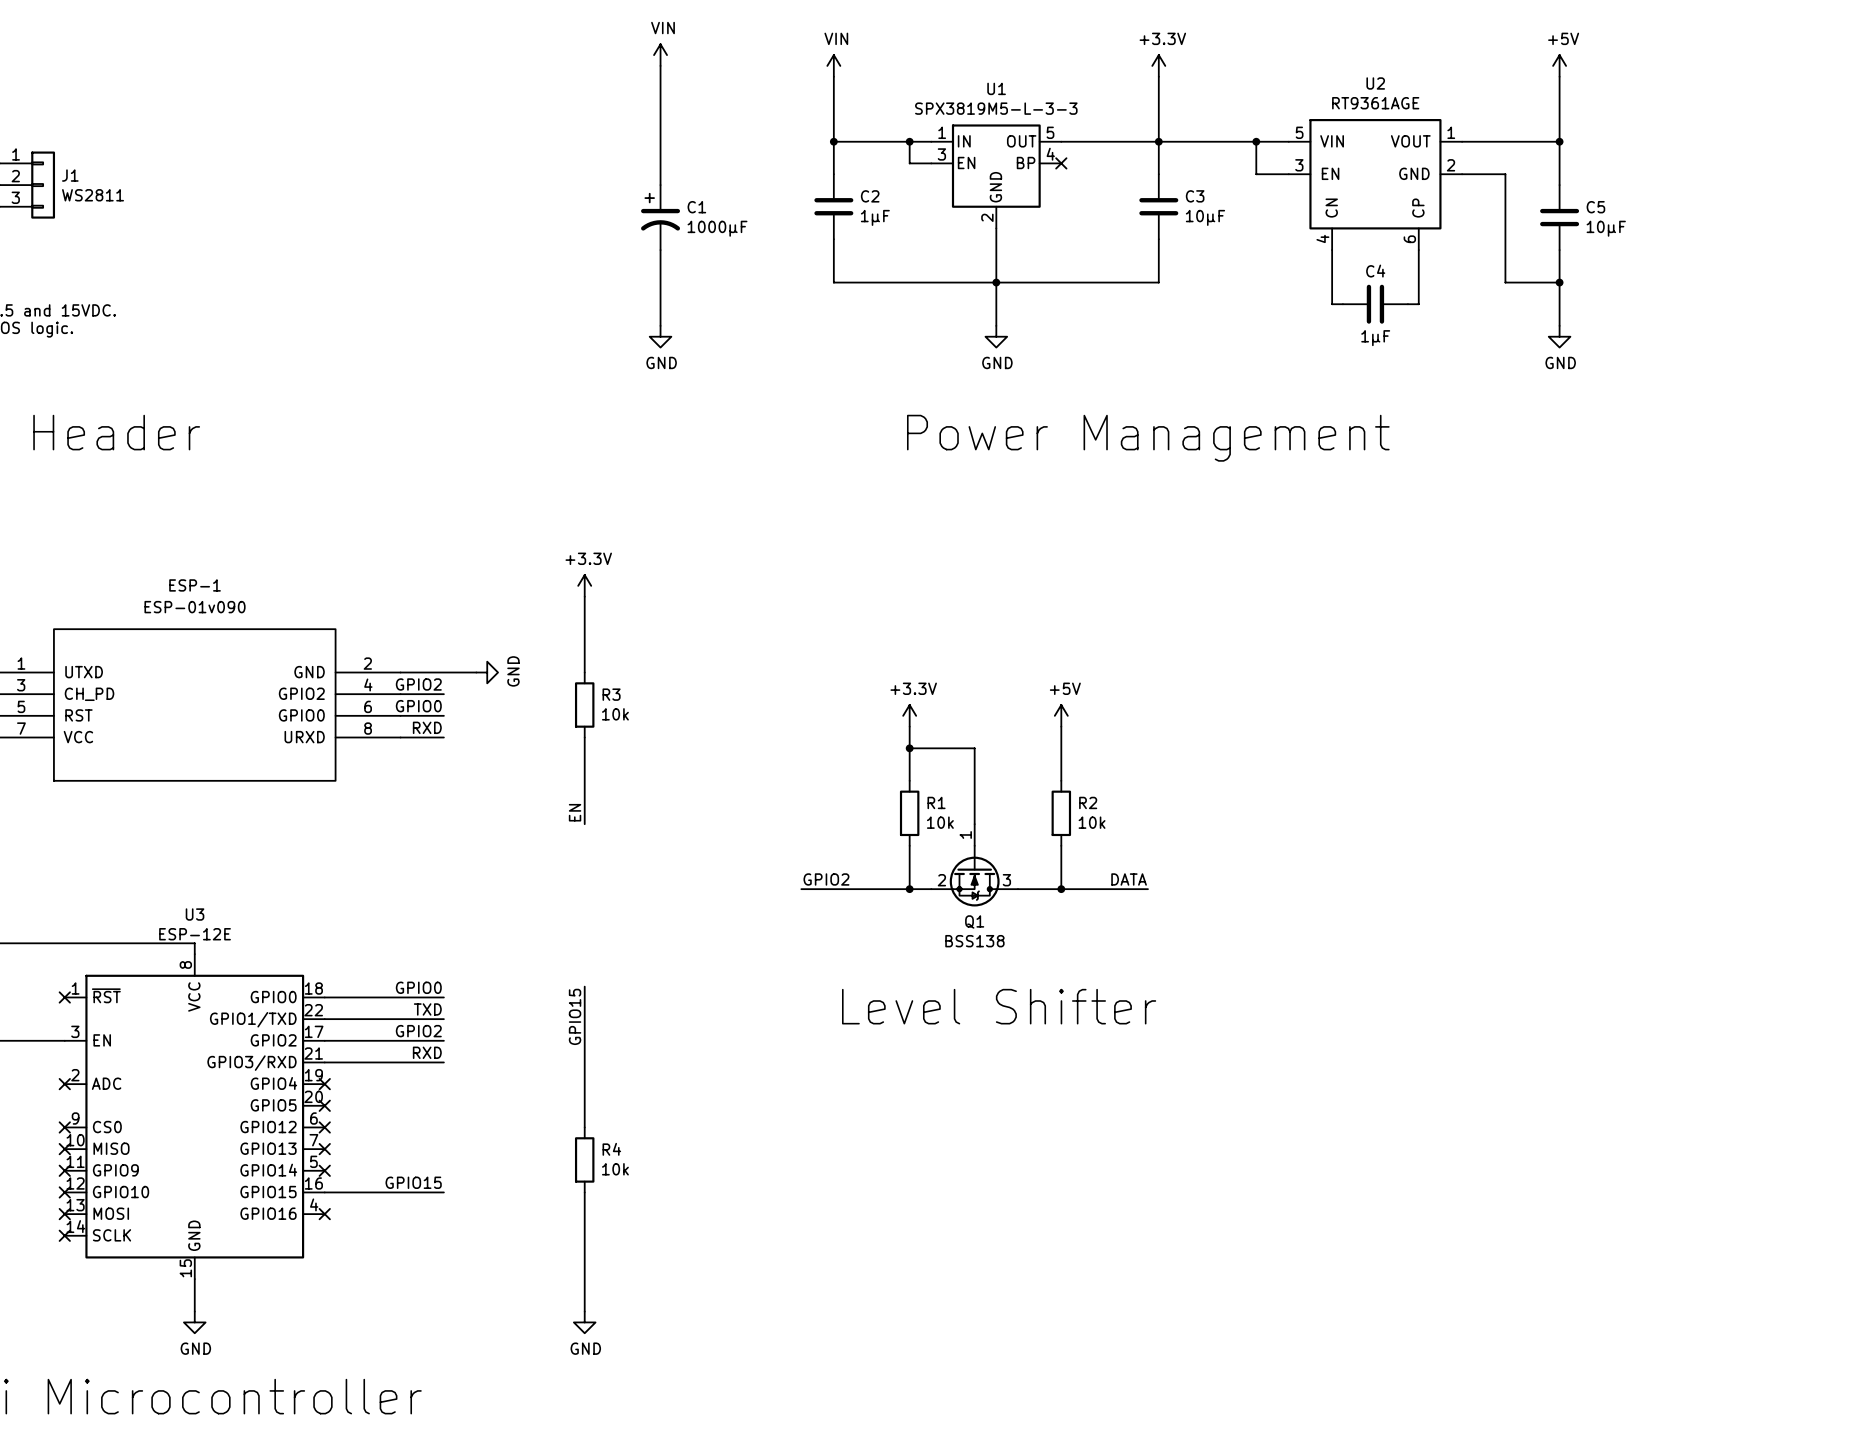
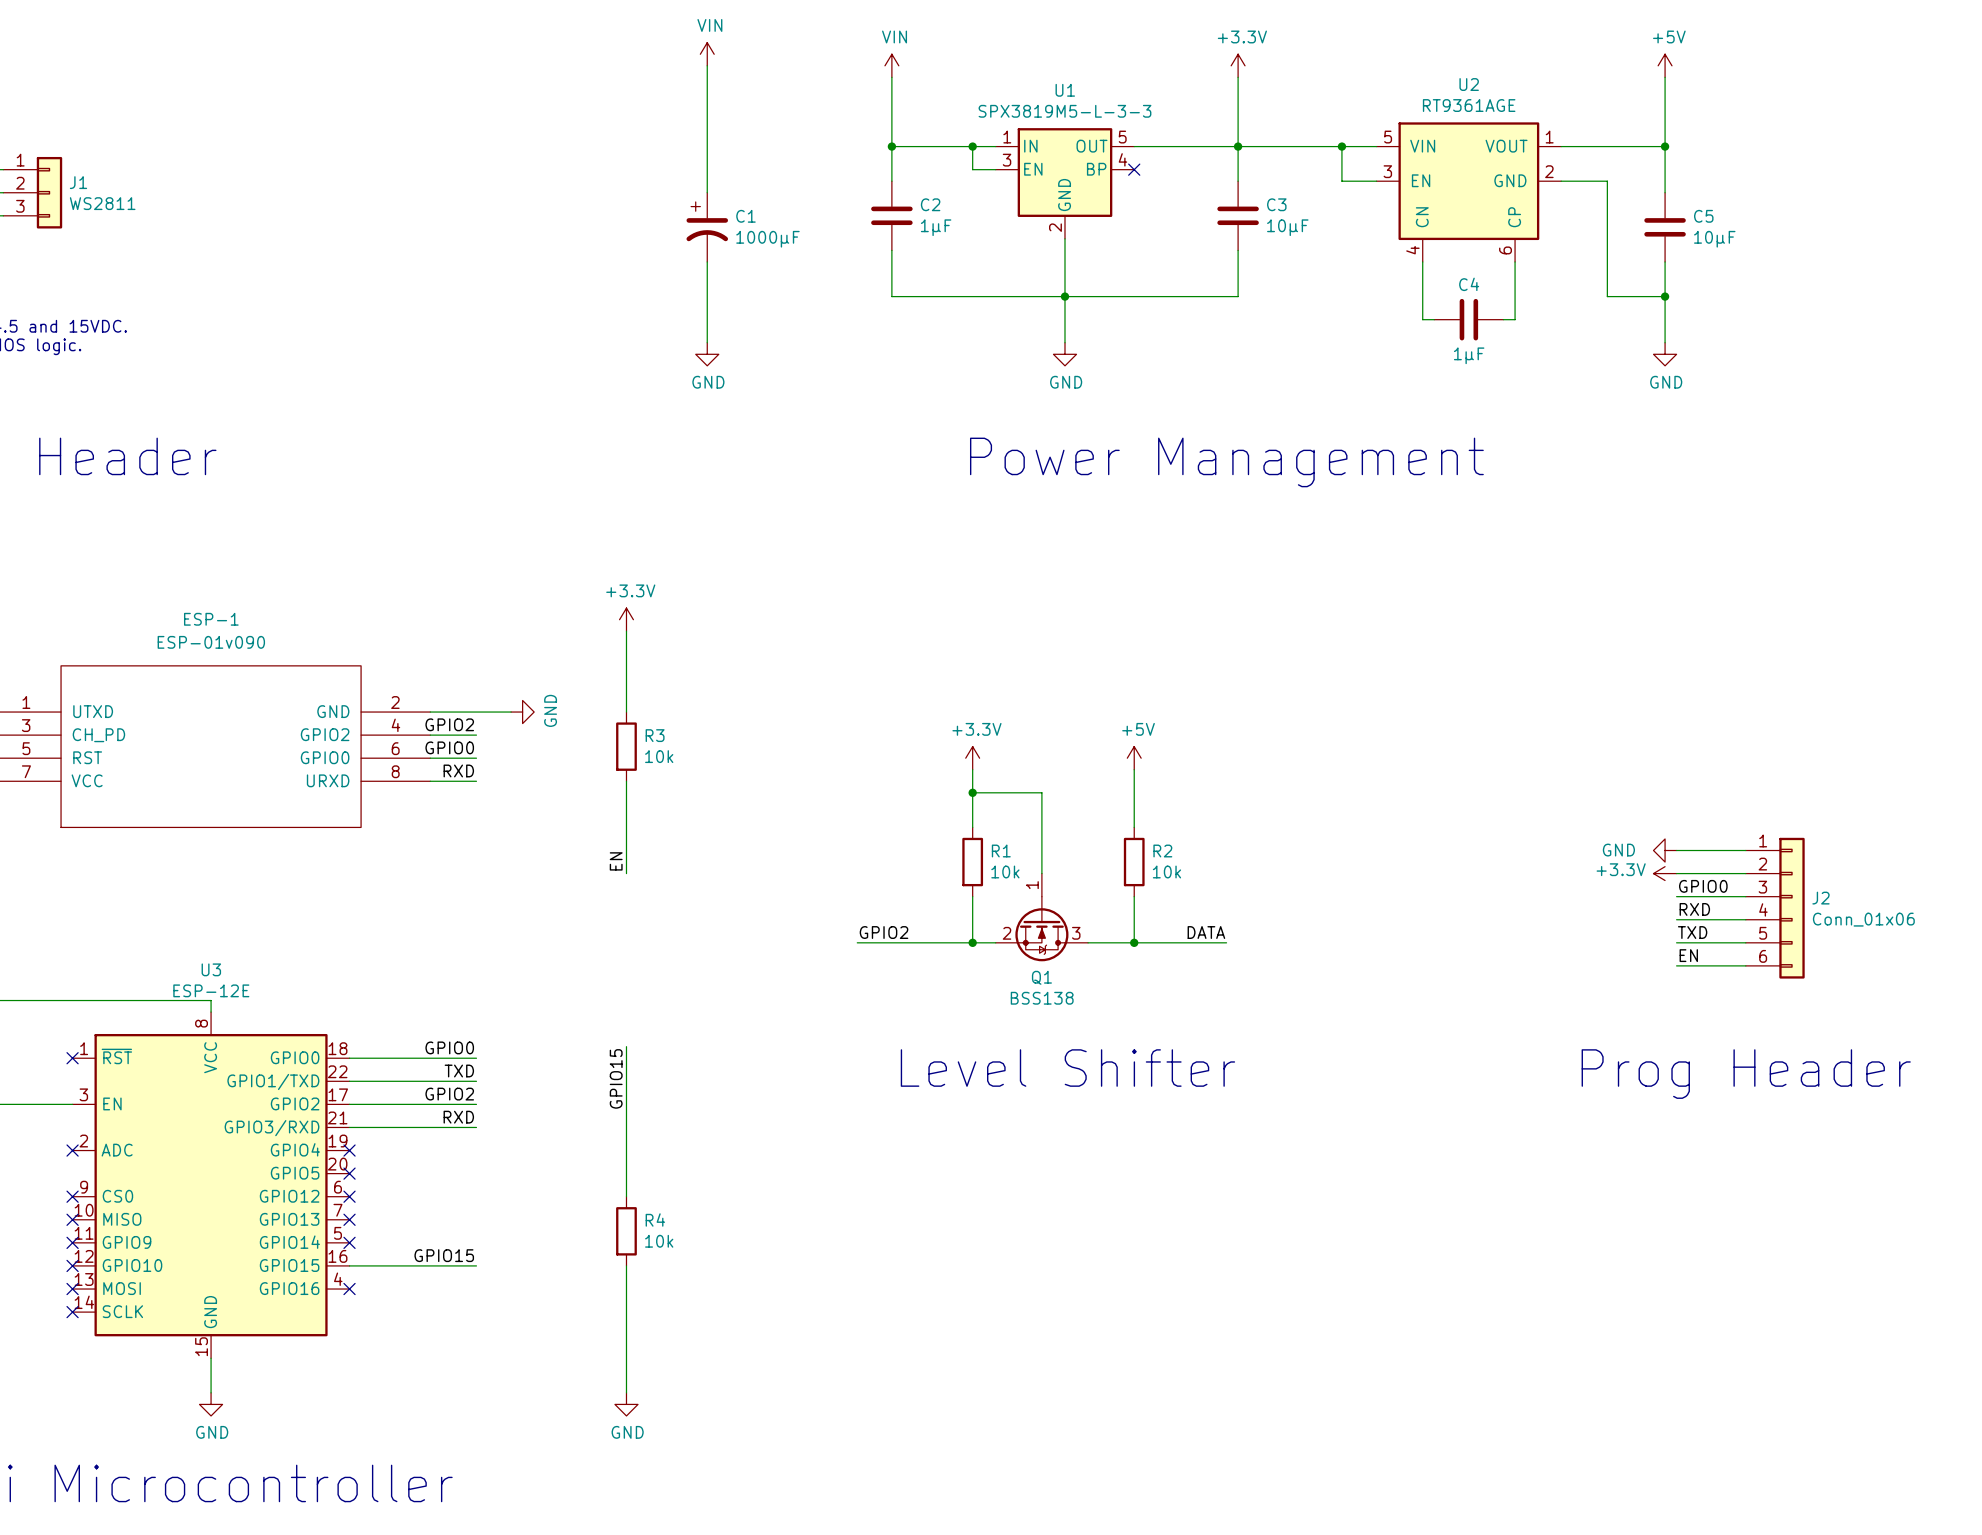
power symbol: none -> GND (1665, 850)
wire: none -> (1676, 850) (1745, 850)
power symbol: none -> +3.3V (1665, 873)
wire: none -> (1676, 873) (1745, 873)
label: none -> GPIO0 (1703, 886)
wire: none -> (1676, 896) (1745, 896)
J2: none -> Conn_01x06 (1775, 908)
label: none -> RXD (1694, 909)
wire: none -> (1676, 919) (1745, 919)
label: none -> TXD (1692, 932)
wire: none -> (1676, 942) (1745, 942)
label: none -> EN (1688, 955)
wire: none -> (1676, 965) (1745, 965)
text: none -> Prog Header (1746, 1074)

